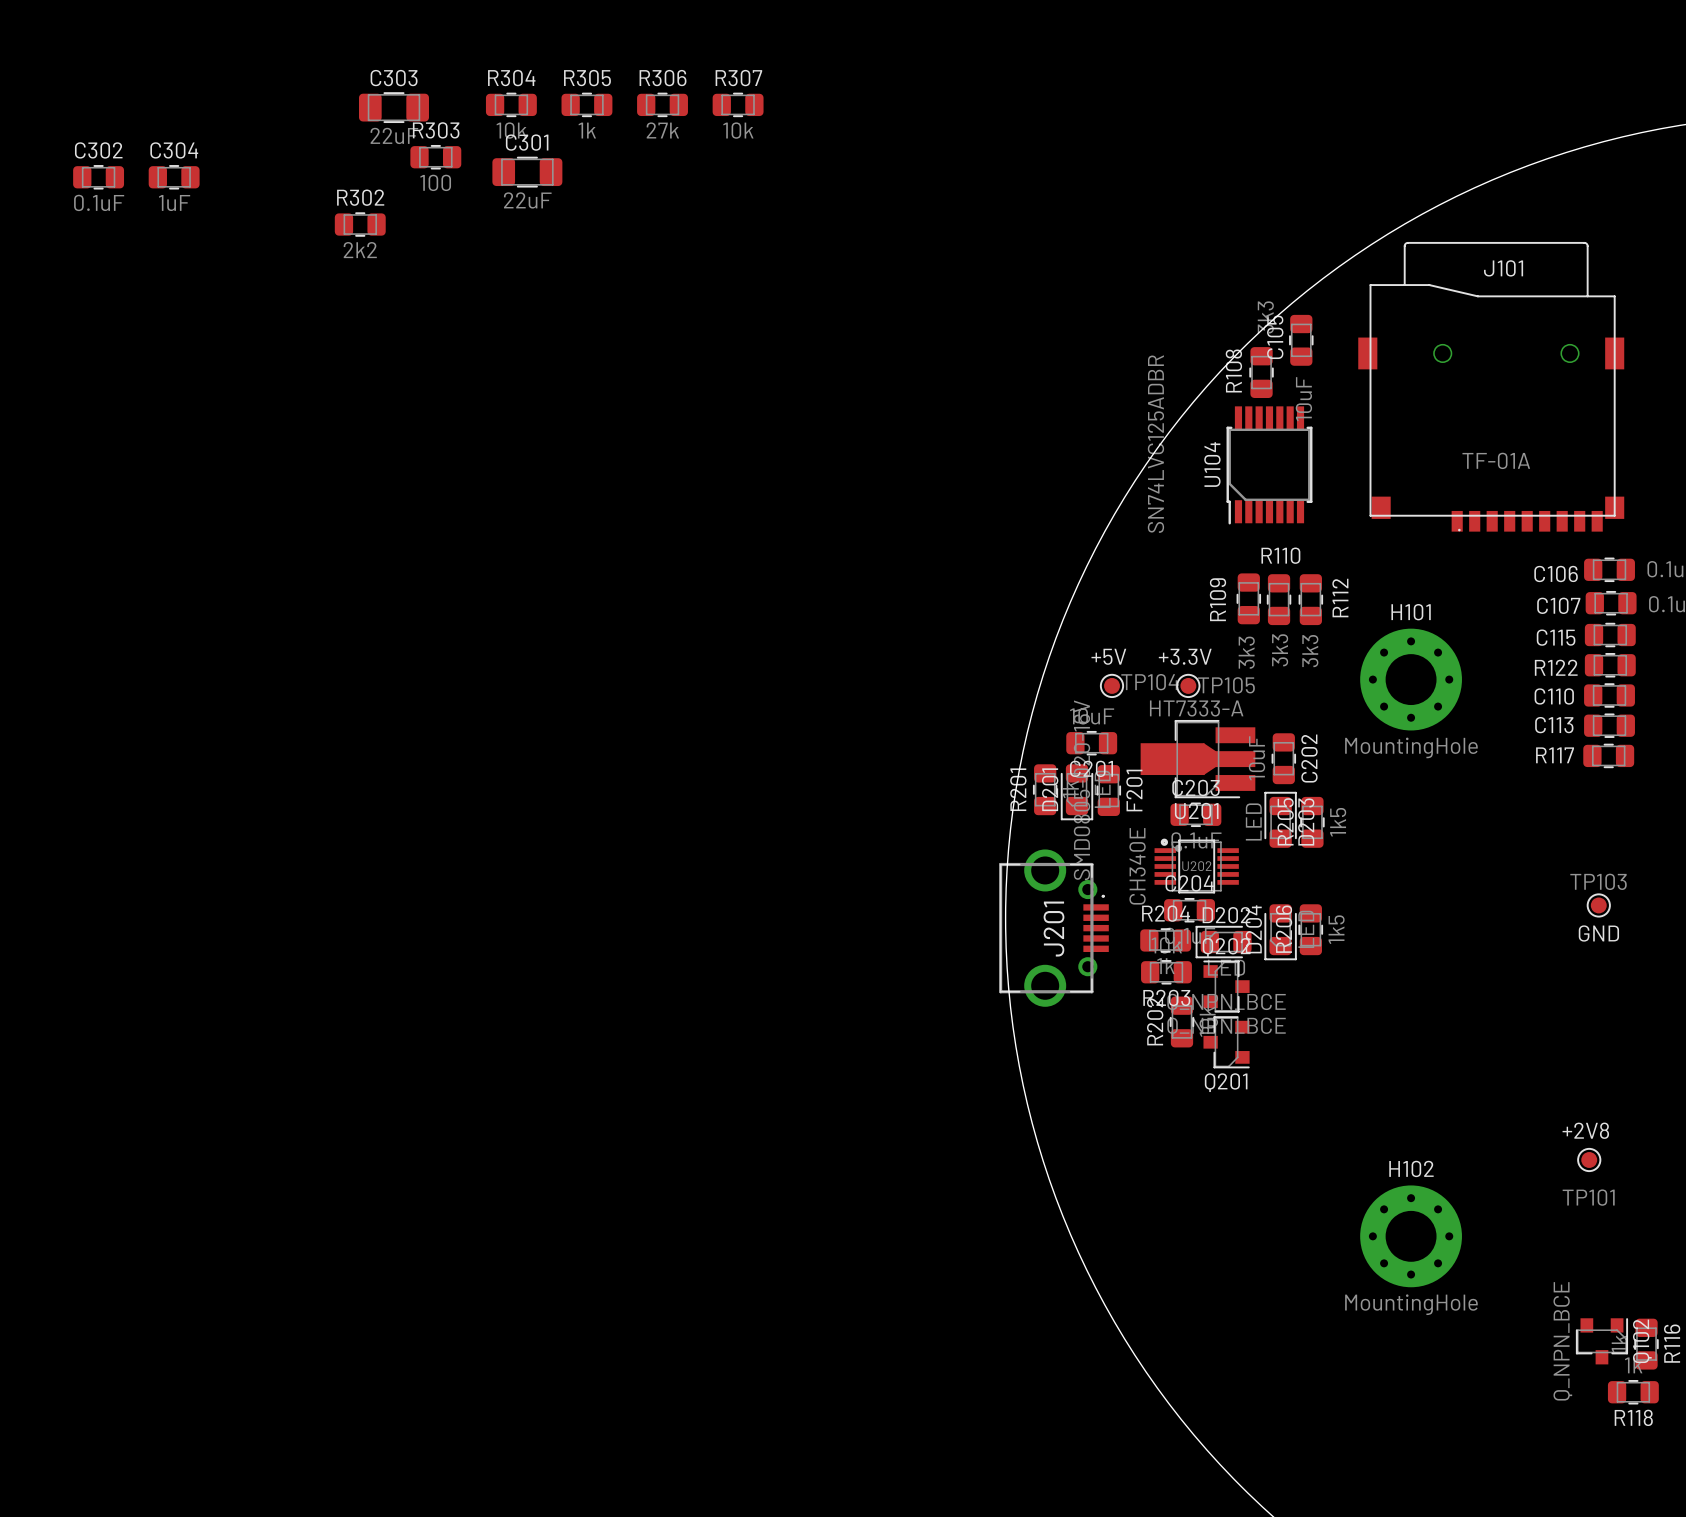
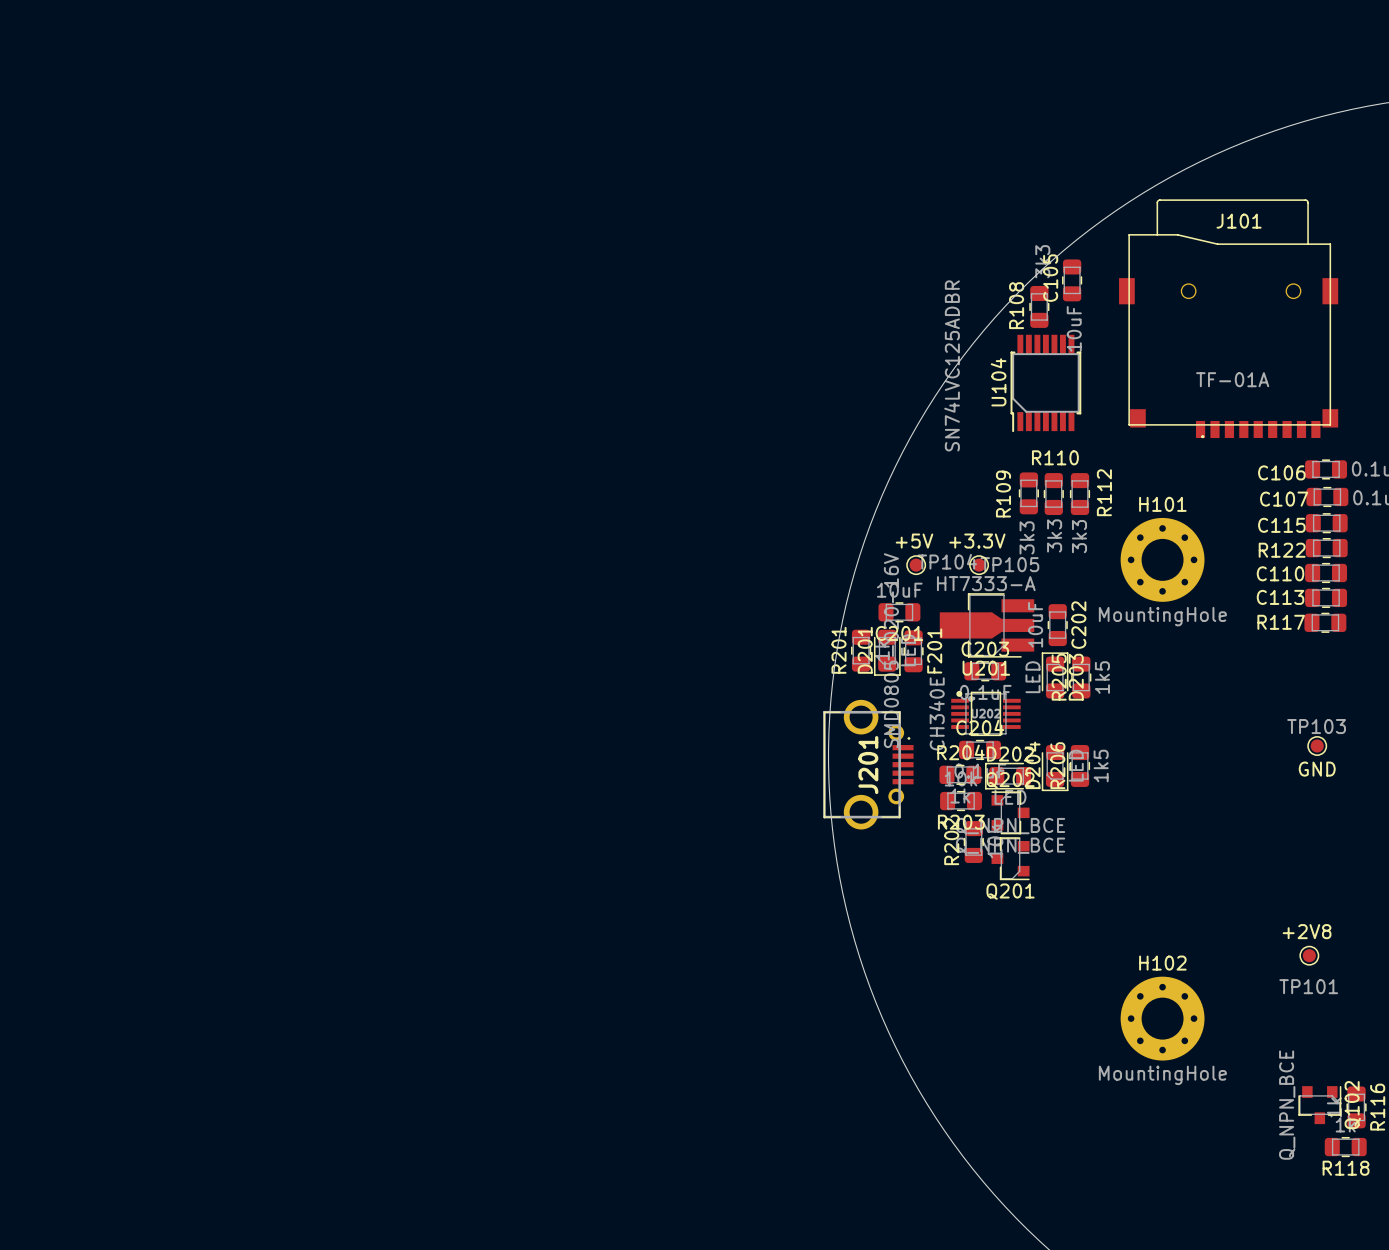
R304: 10k (511, 104) -> none
R305: 1k (586, 104) -> none
R306: 27k (662, 104) -> none
R307: 10k (738, 104) -> none
C303: 22uF (393, 107) -> none
R303: 100 (435, 157) -> none
C301: 22uF (527, 172) -> none
C302: 0.1uF (98, 177) -> none
C304: 1uF (174, 177) -> none
R302: 2k2 (360, 224) -> none

